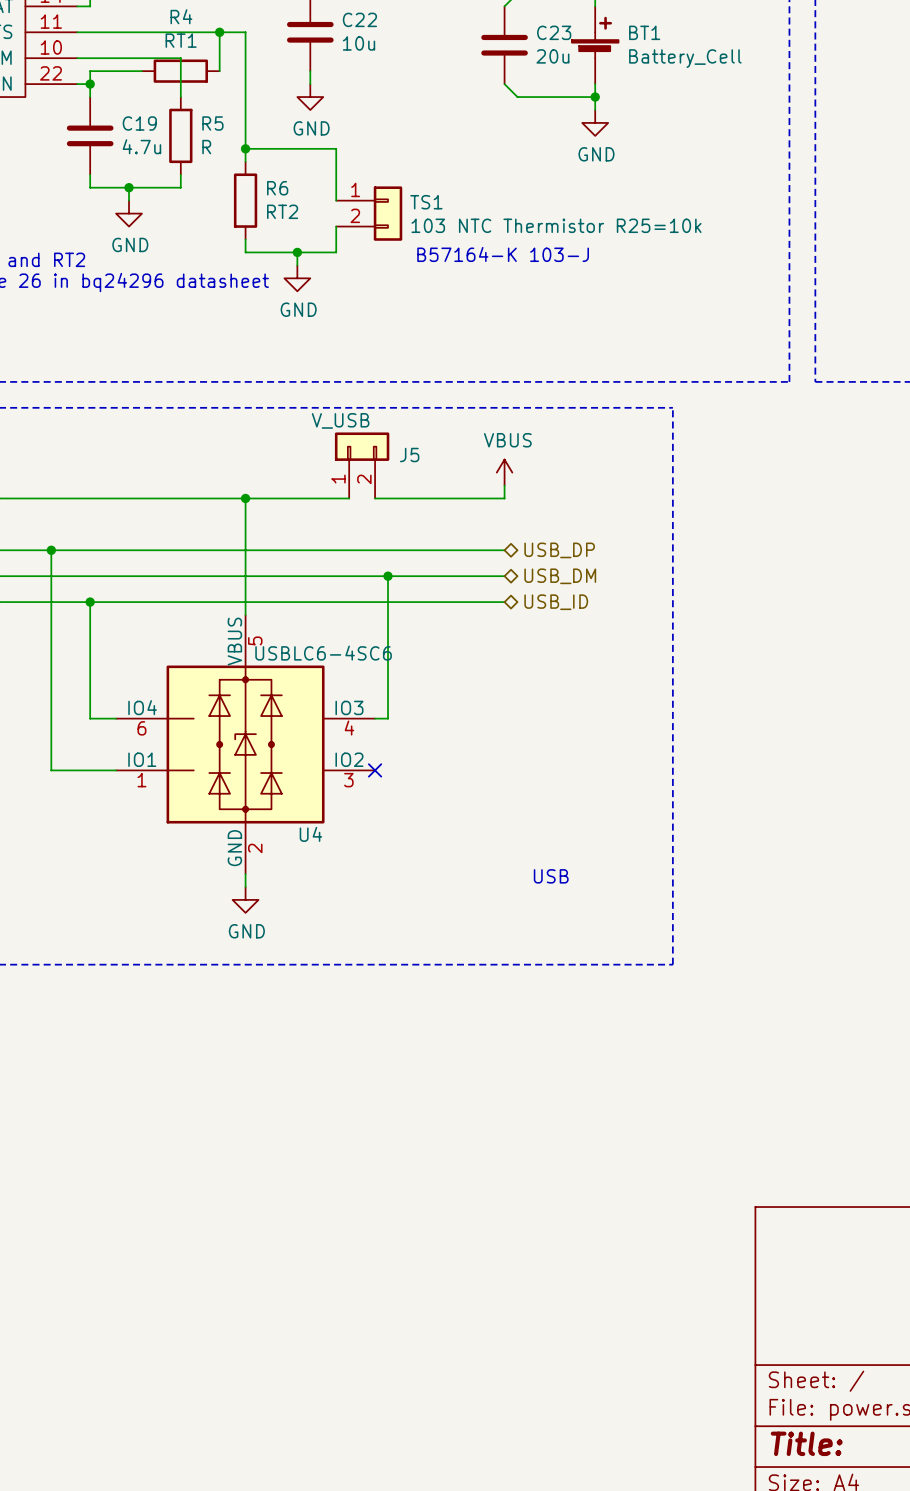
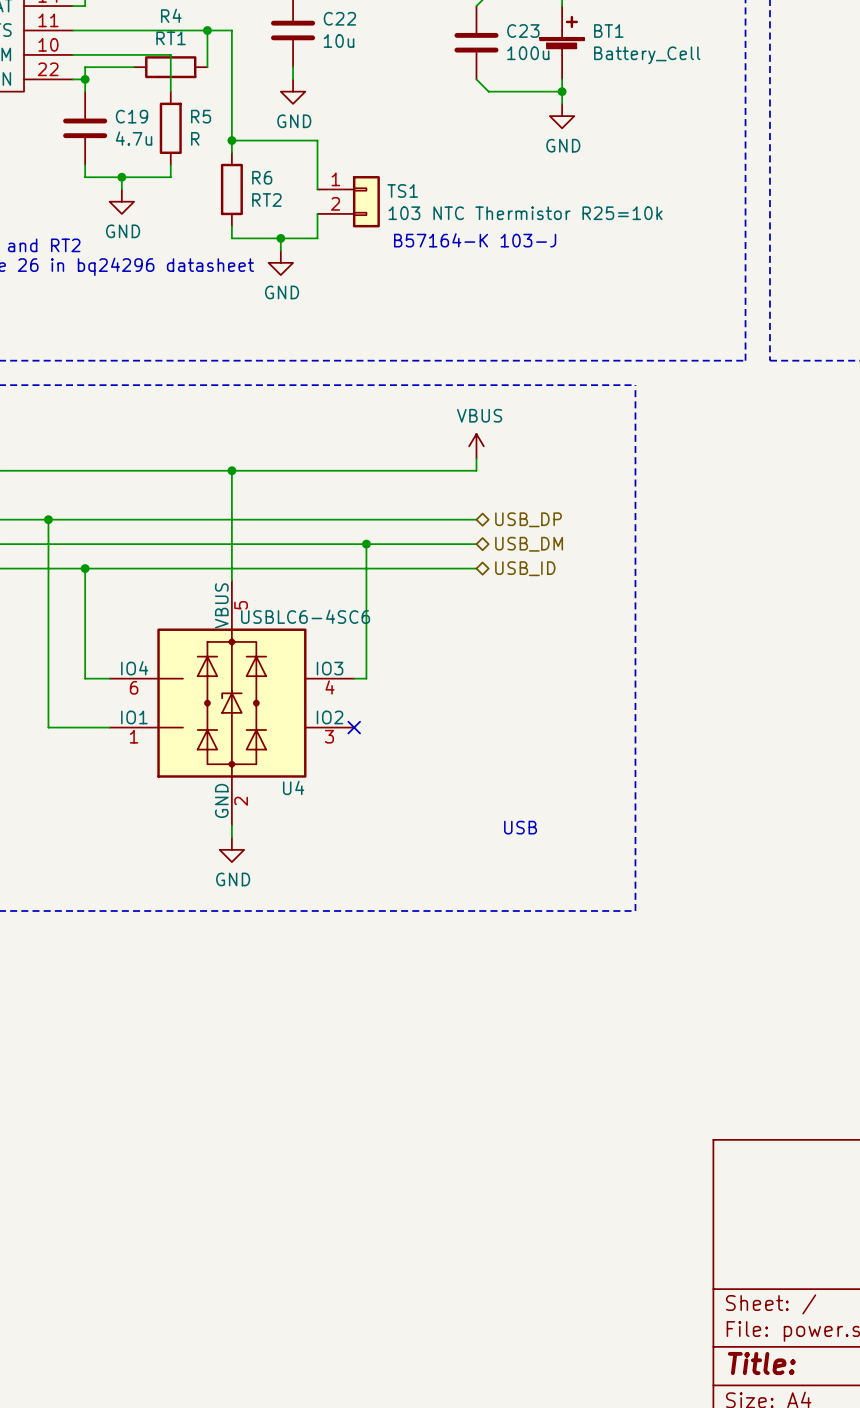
C23 value: 20u (552, 56) -> 100u (528, 53)
J5: V_USB (362, 465) -> none
wire: none -> (329, 470) (354, 470)

